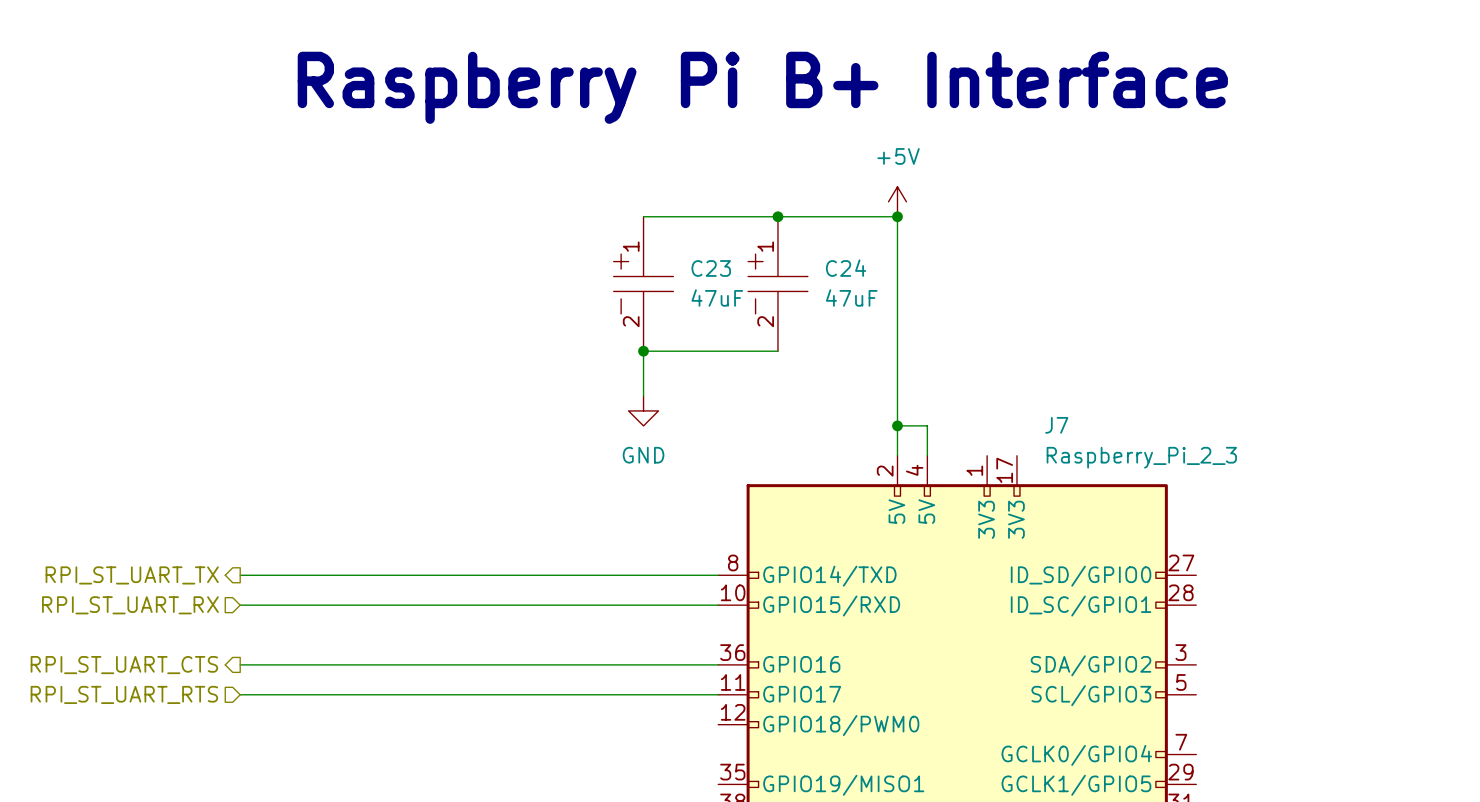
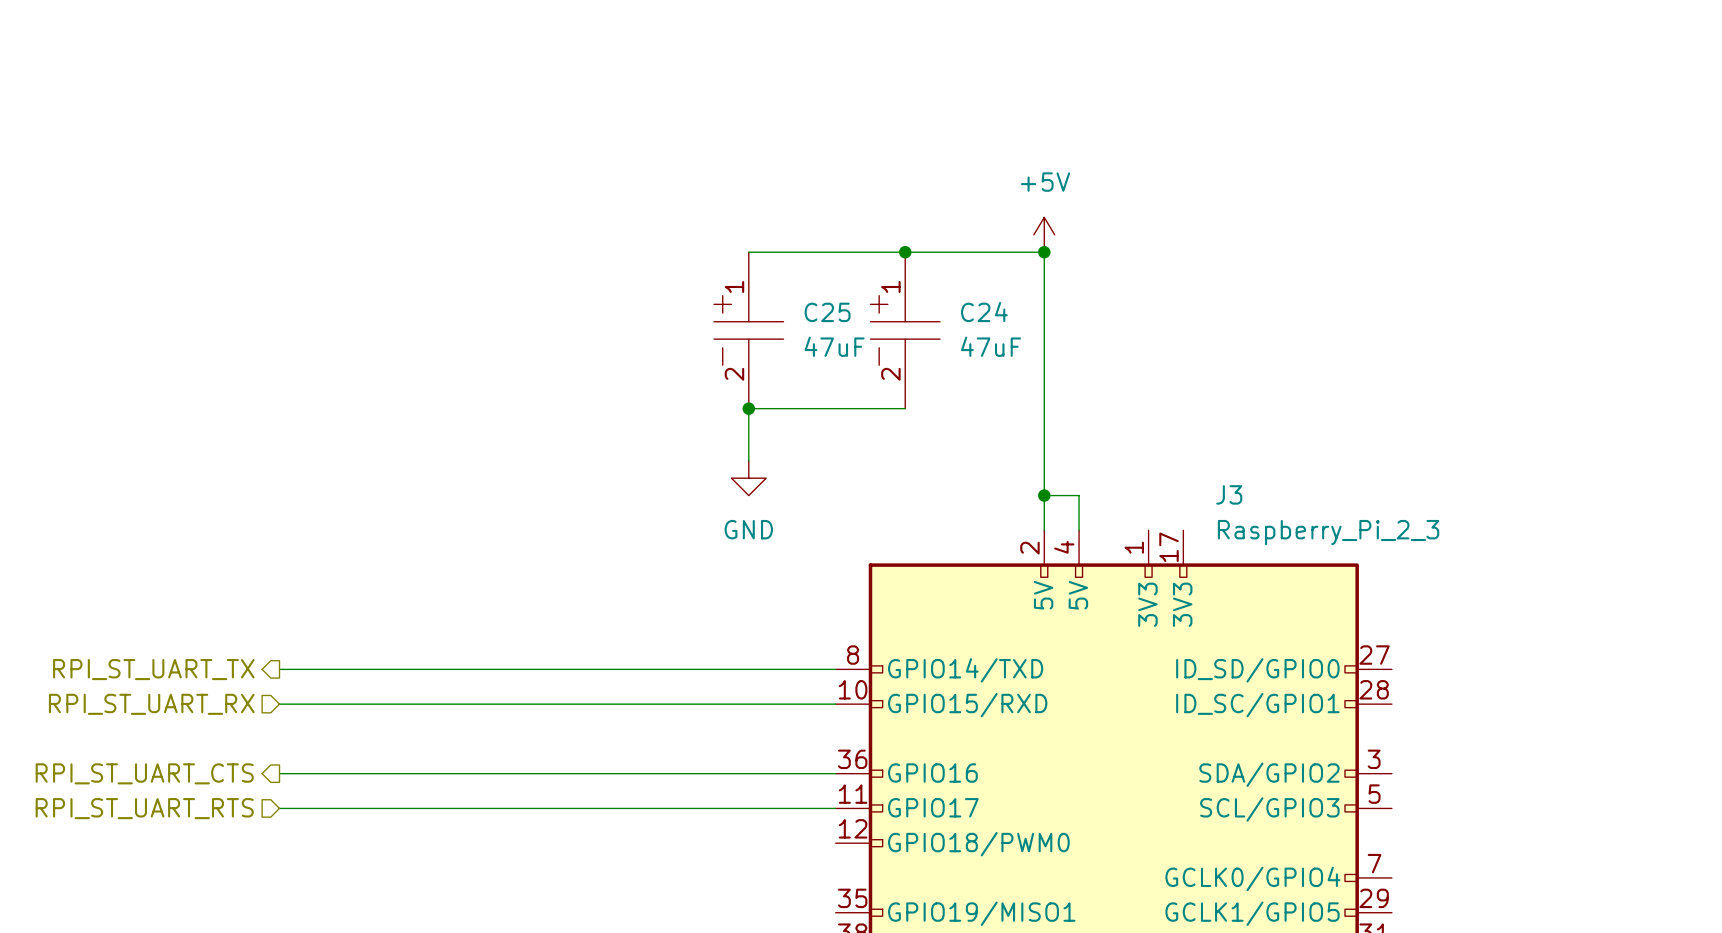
text: Raspberry Pi B+ Interface (762, 87) -> none
C23 name: C23 (711, 268) -> C25 (827, 312)
J7 name: J7 (1056, 425) -> J3 (1229, 494)

